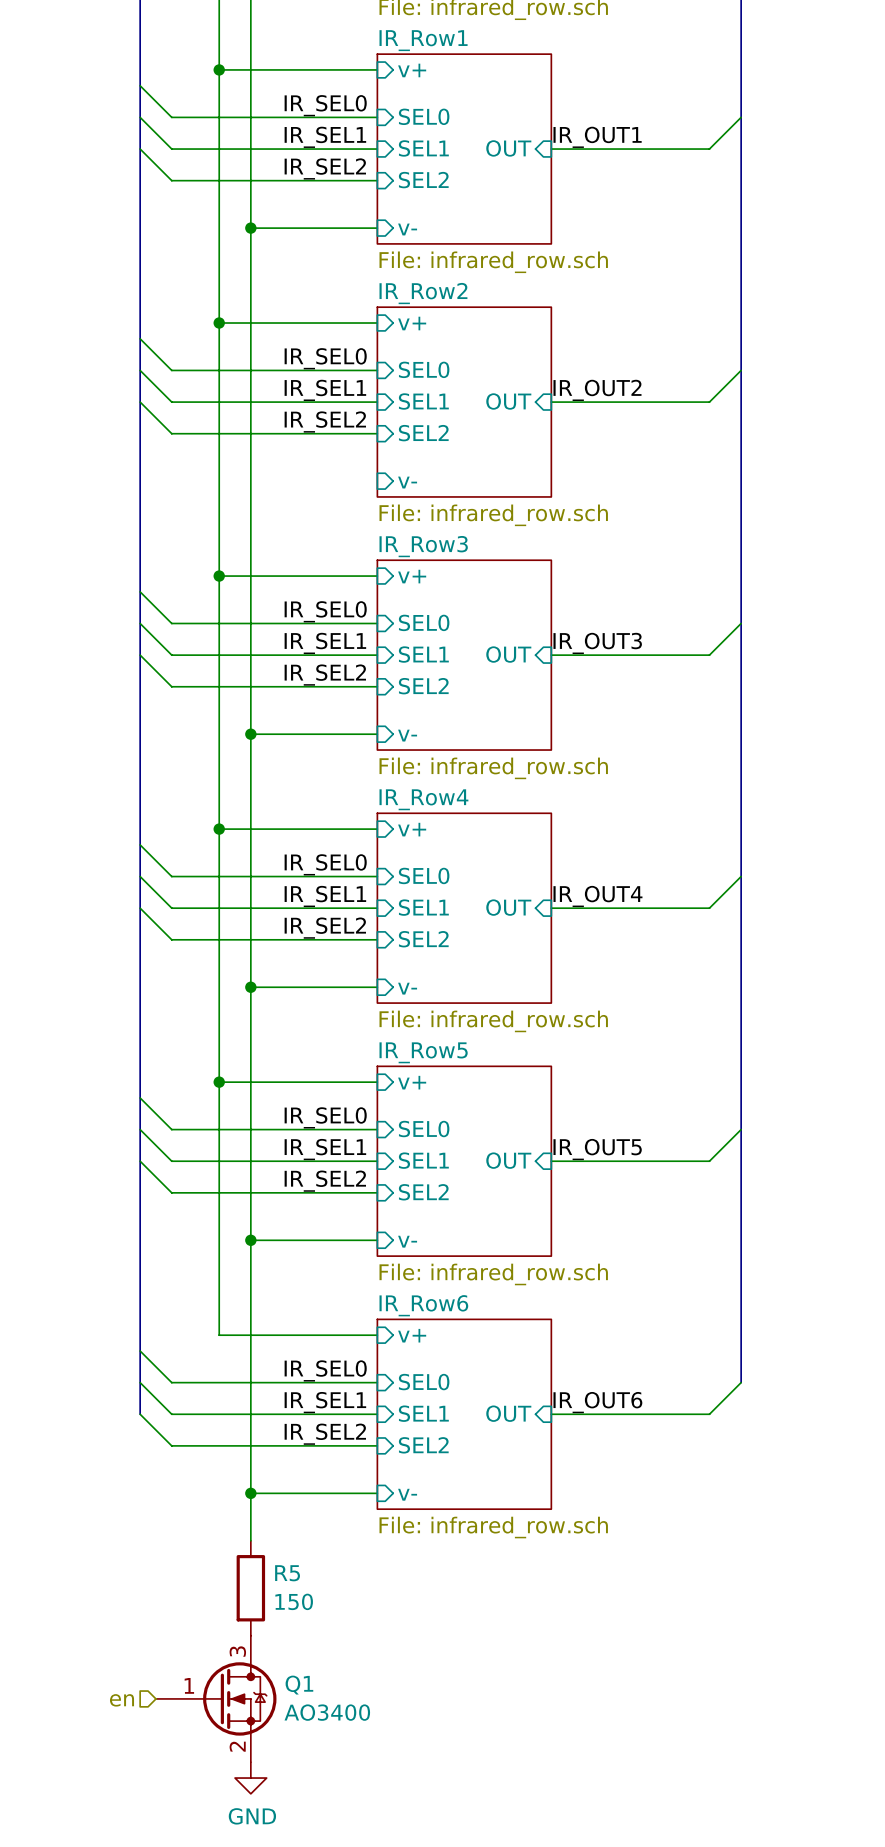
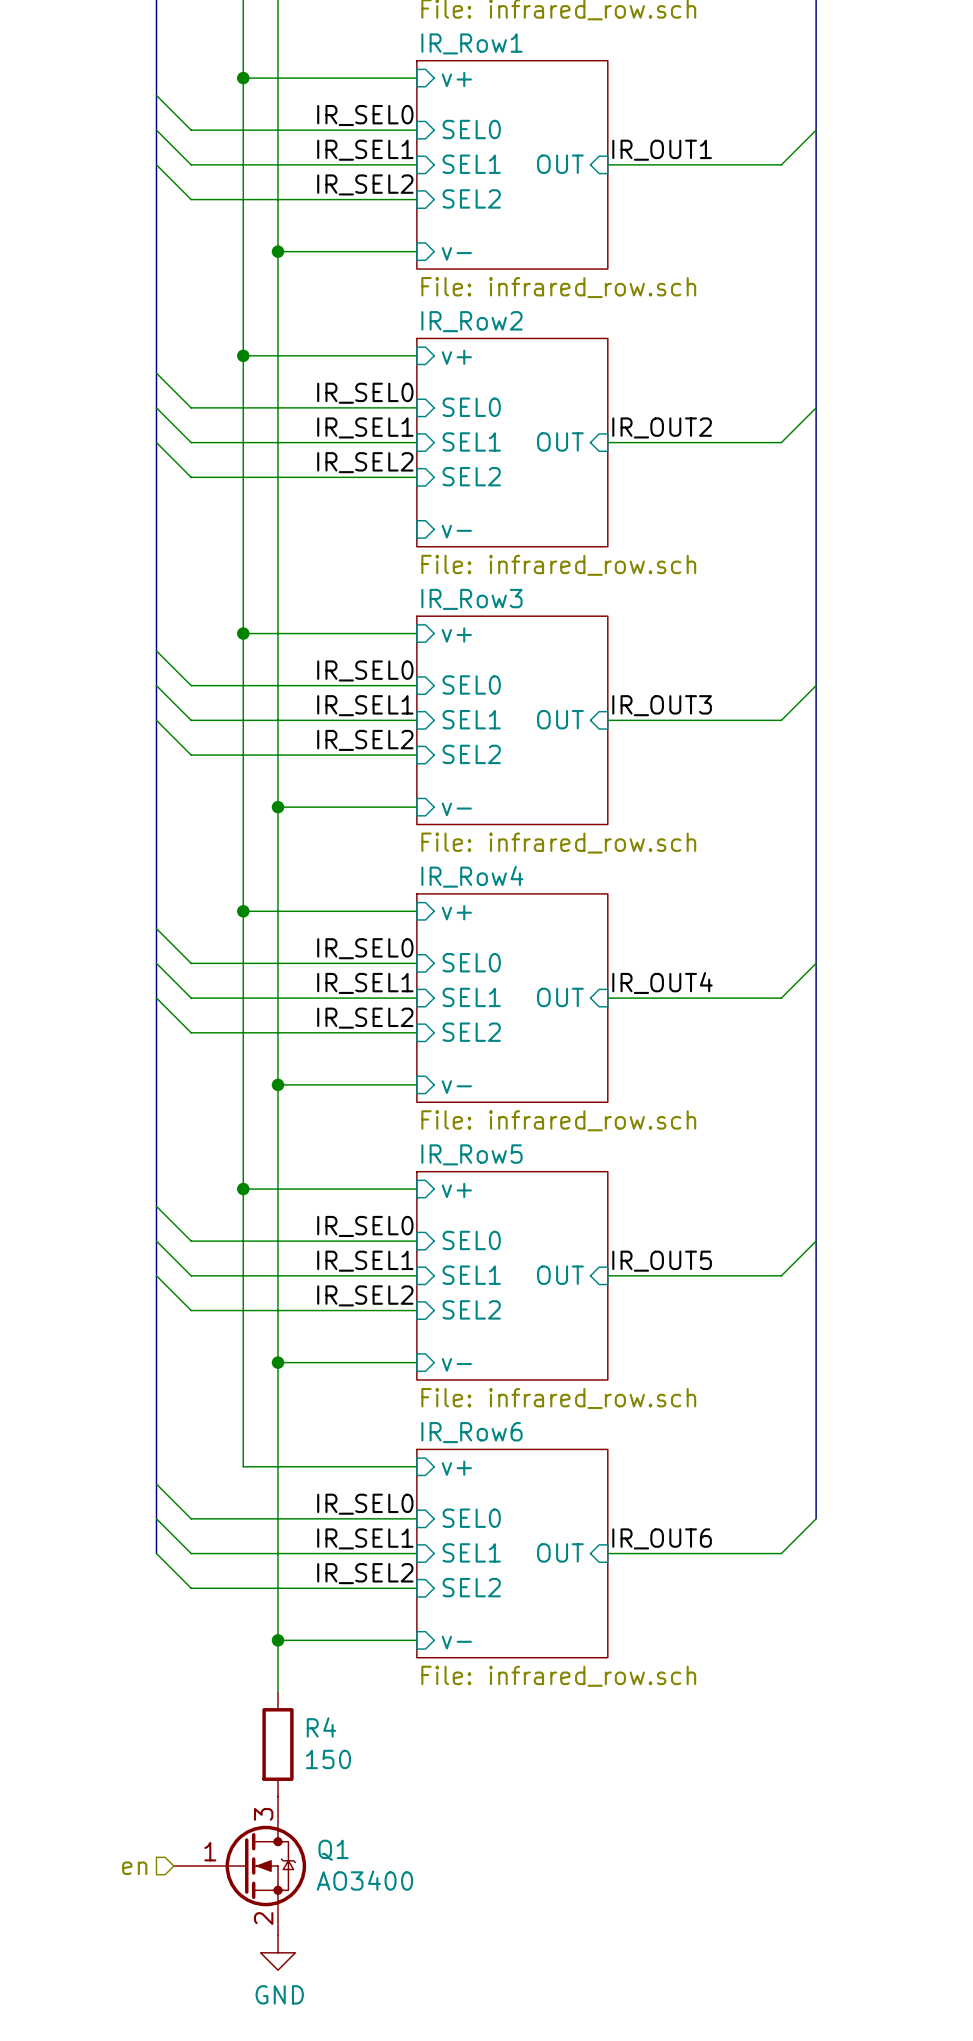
R5 name: R5 (287, 1573) -> R4 (321, 1727)

